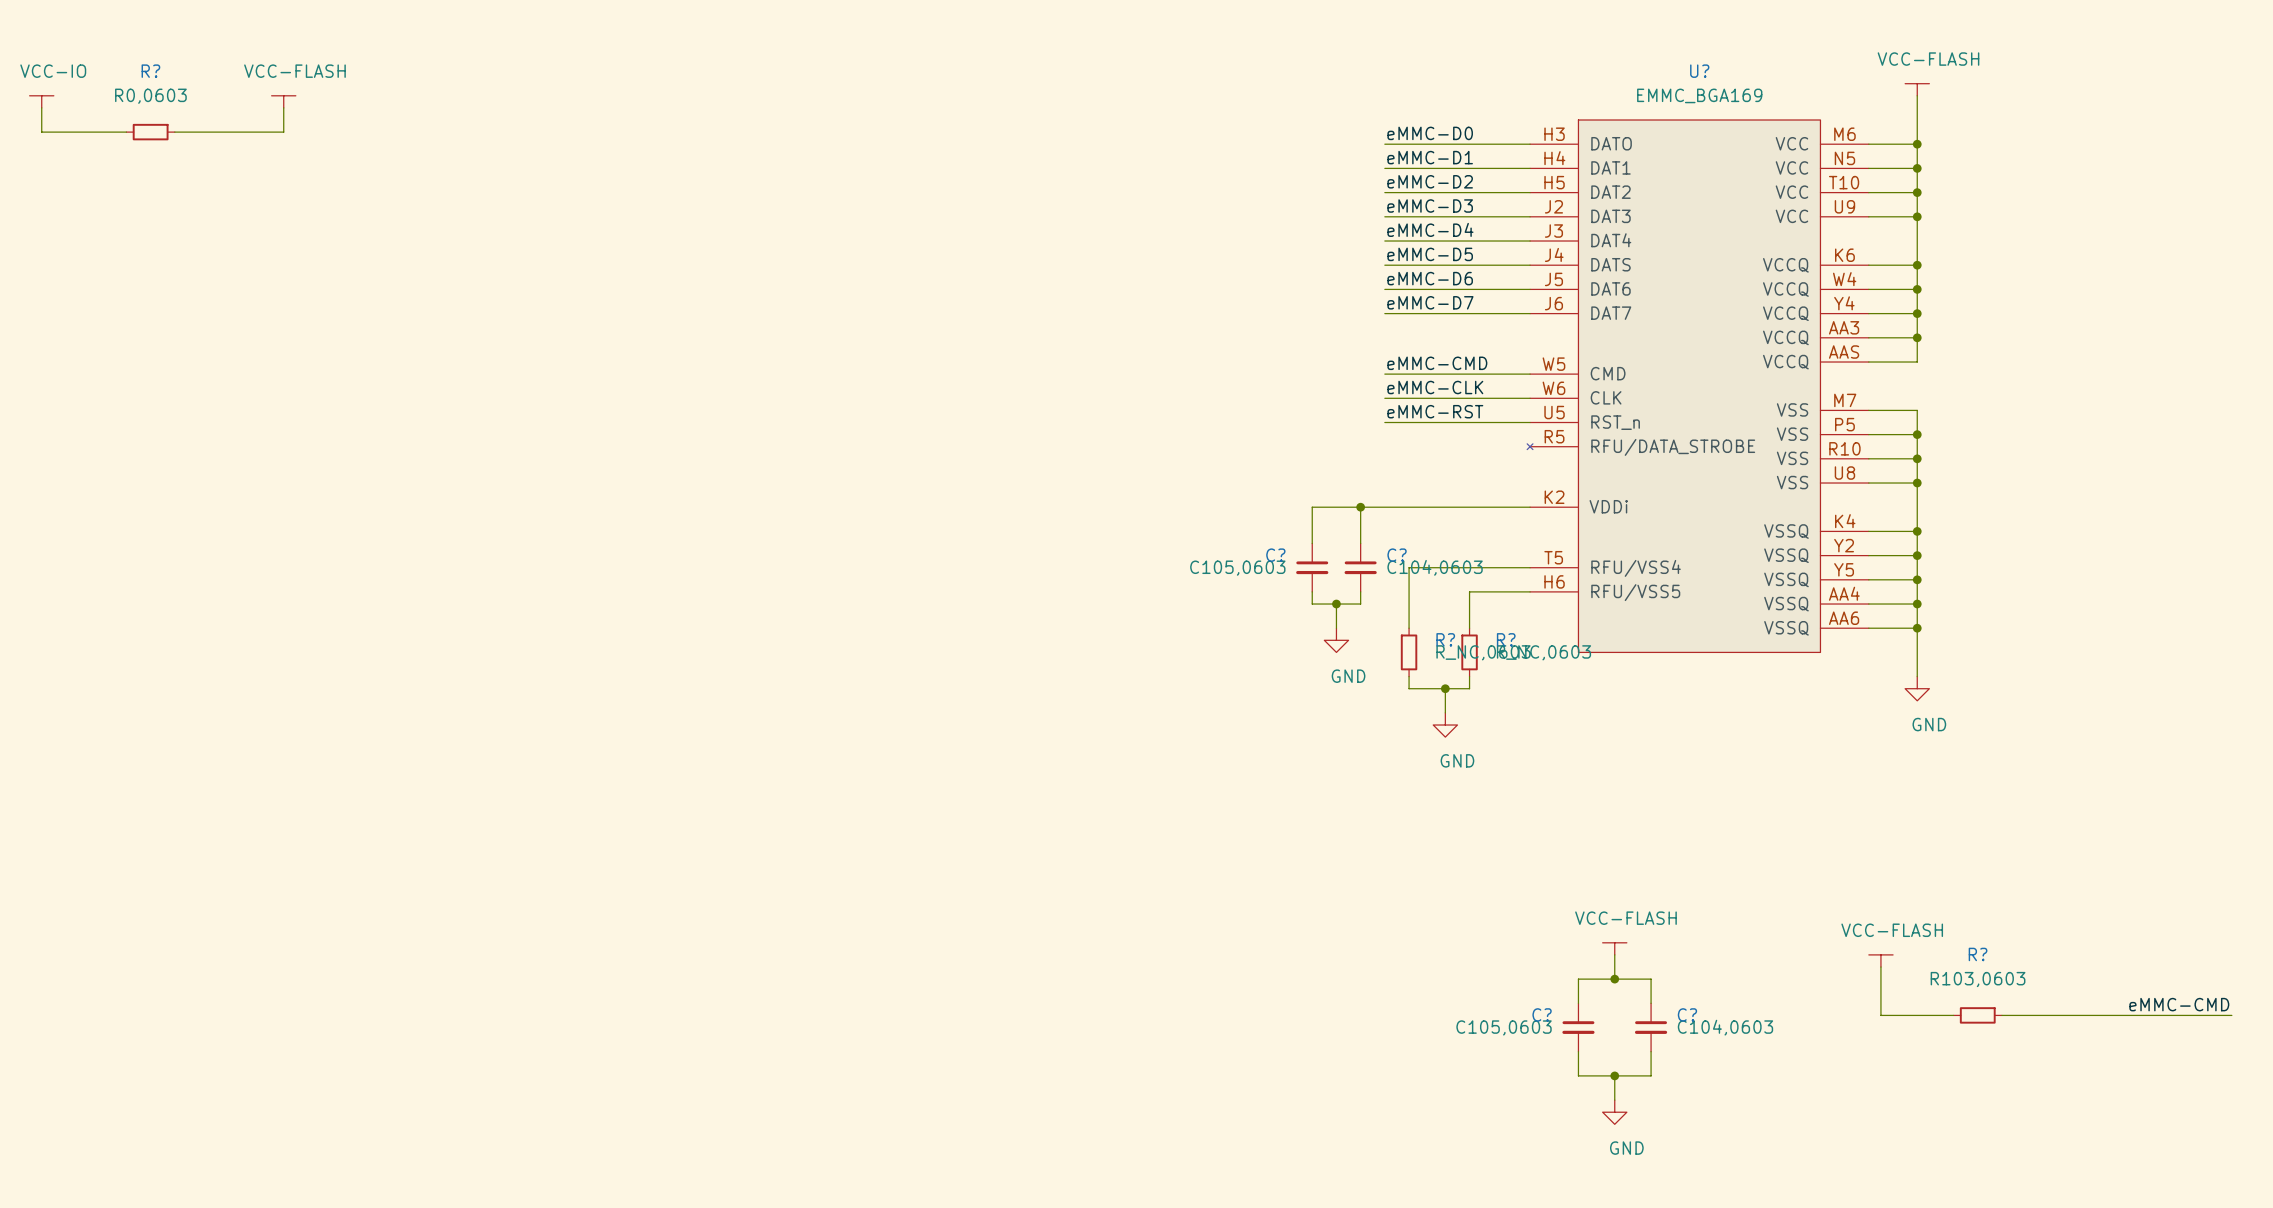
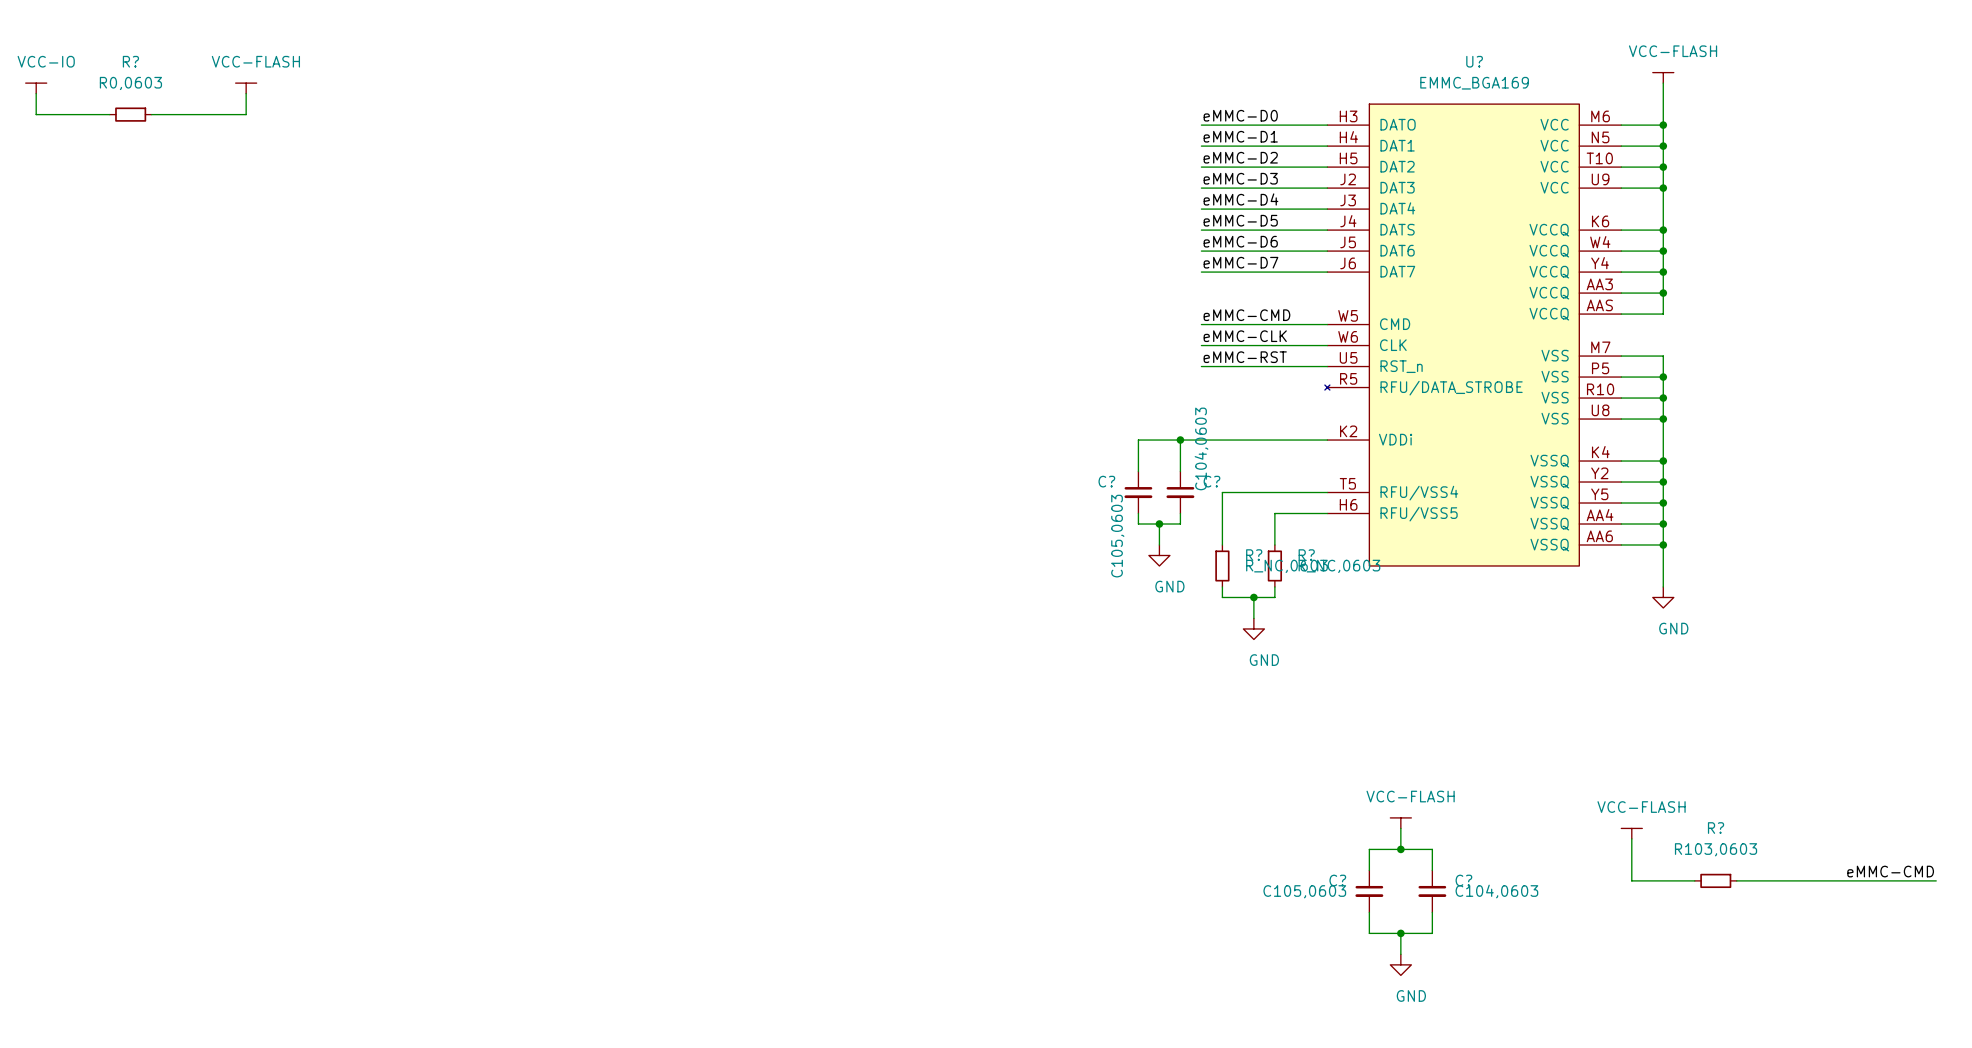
C? value rotation: 0° (1435, 567) -> 90° counterclockwise (1201, 448)
C? value rotation: 0° (1237, 568) -> 90° counterclockwise (1117, 536)

